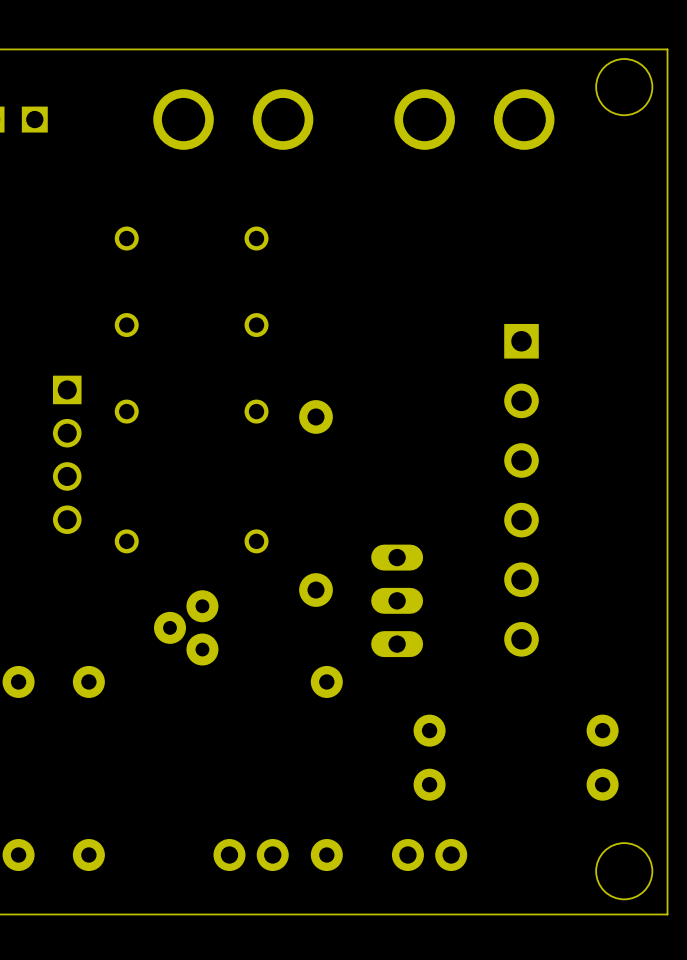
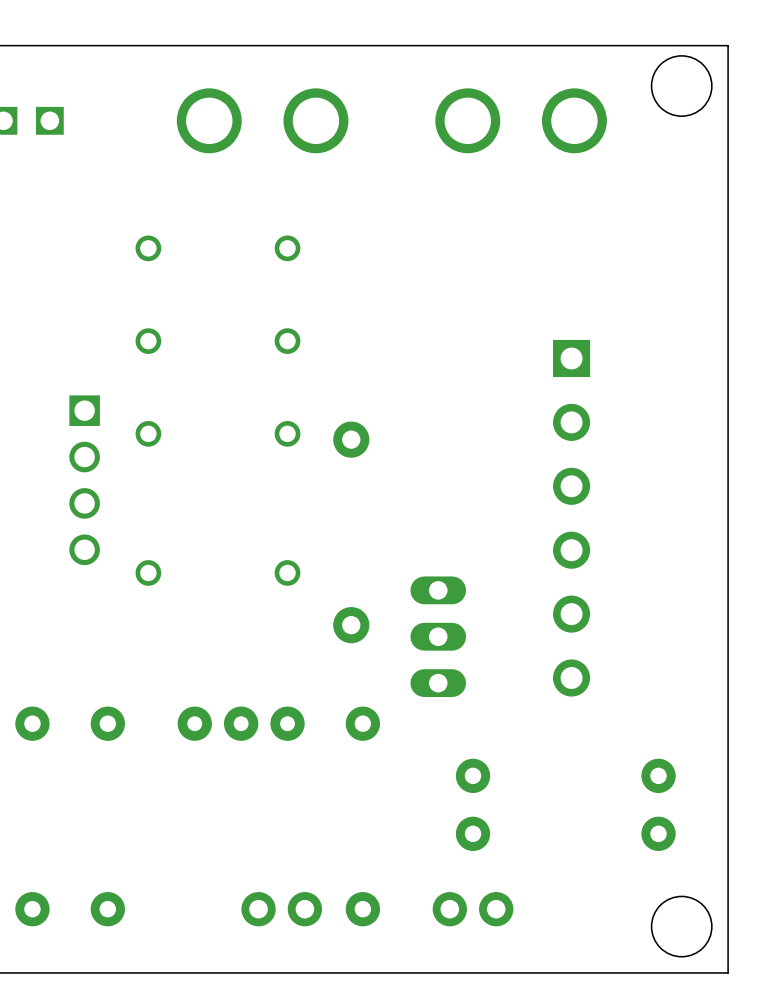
part: (186, 627) -> none
part: none -> (241, 723)

